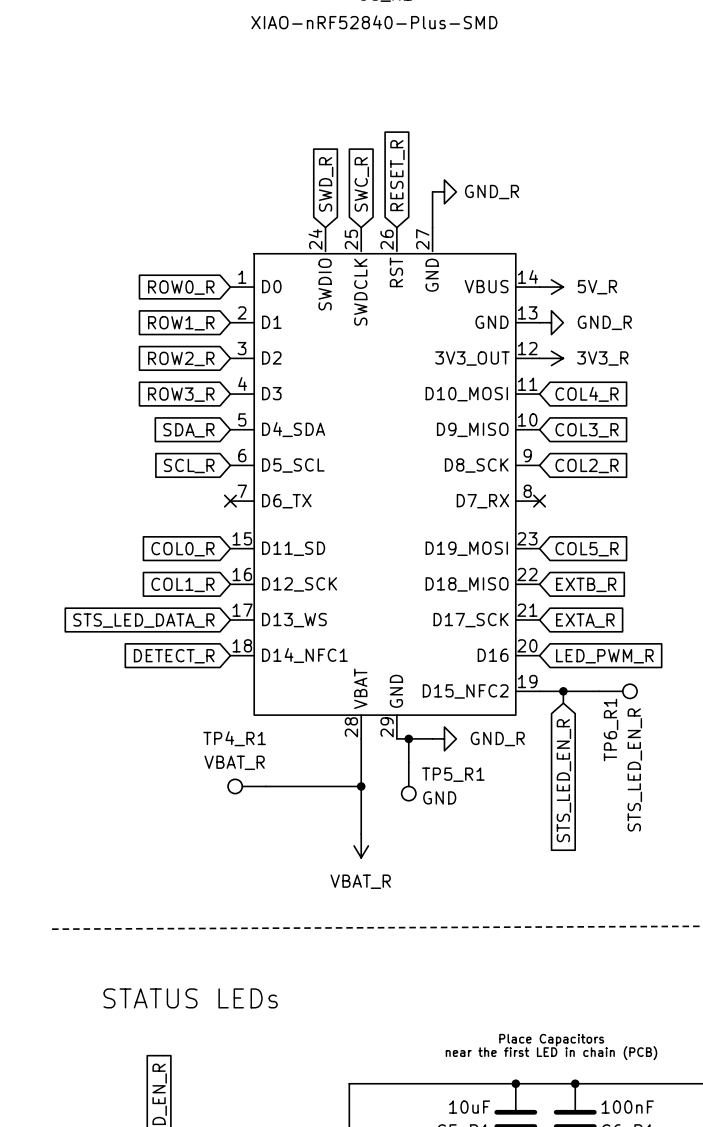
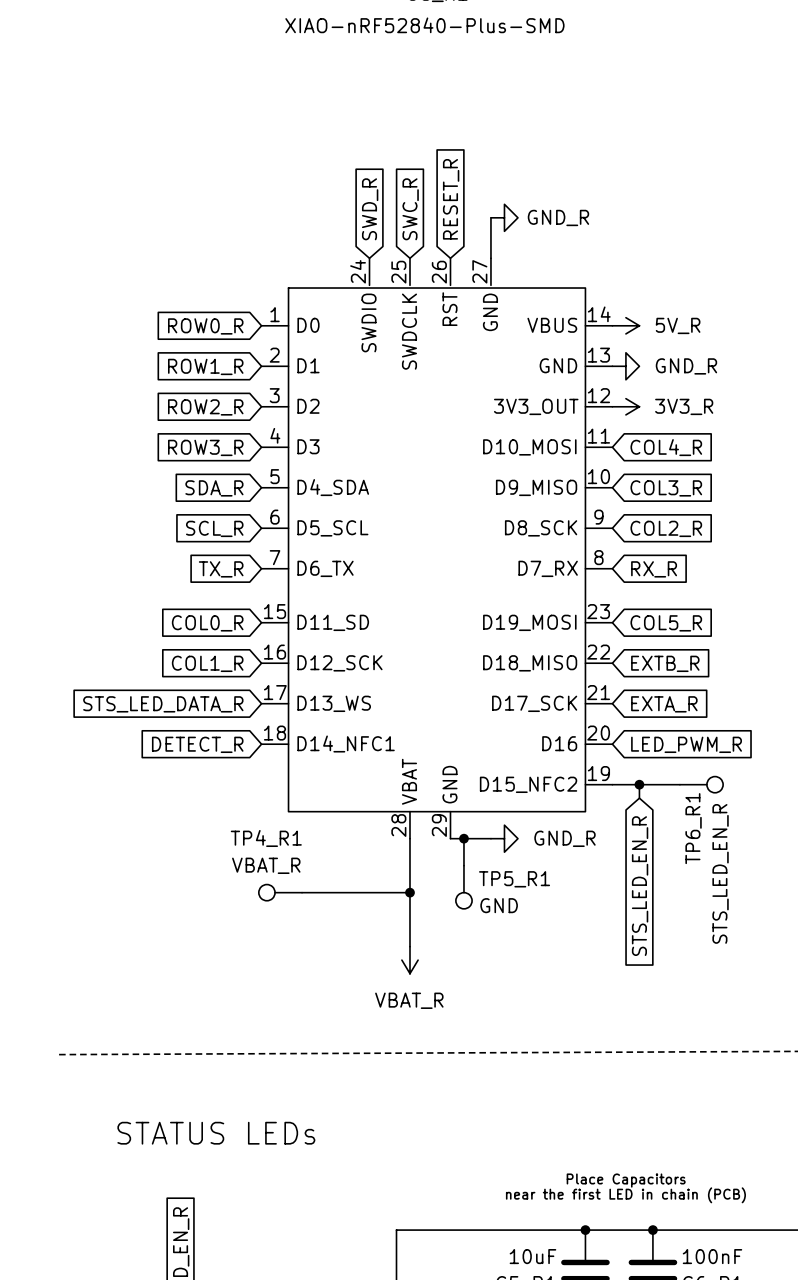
global label: none -> TX_R (221, 569)
no-connect mark: (230, 501) -> none
no-connect mark: (539, 501) -> none
global label: none -> RX_R (654, 569)

